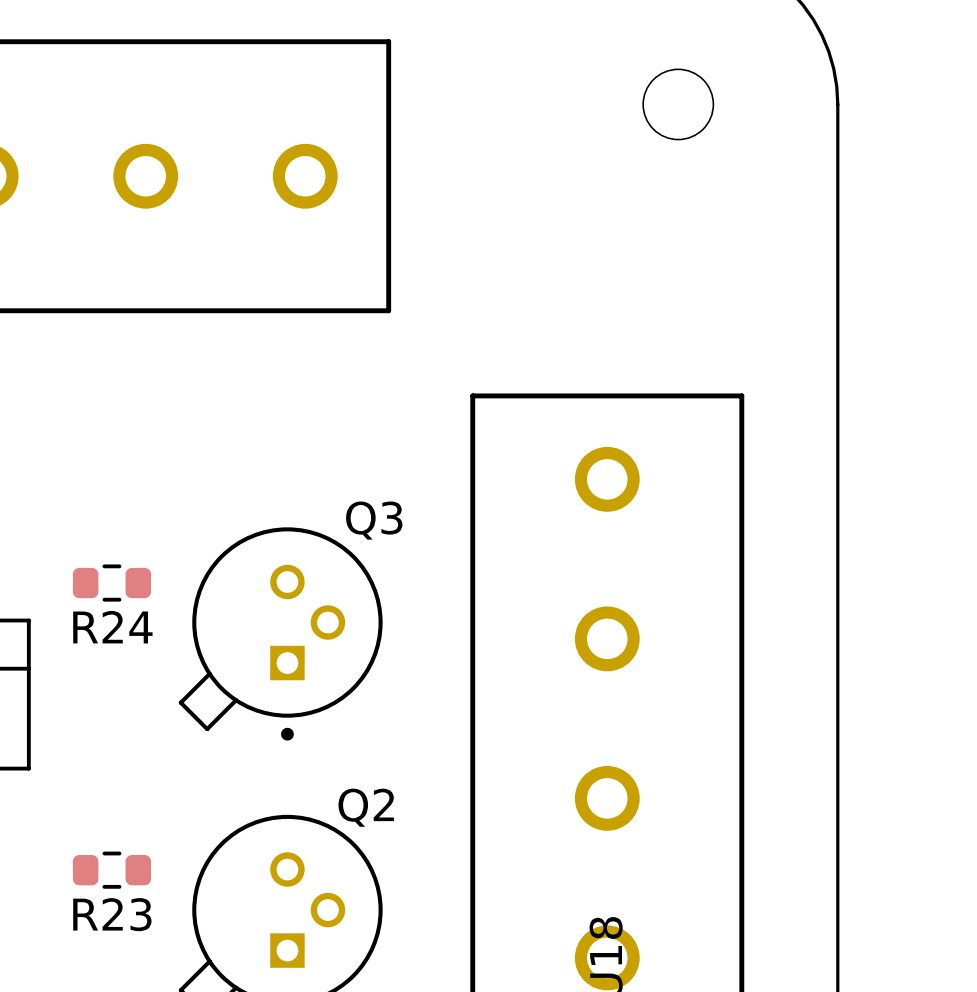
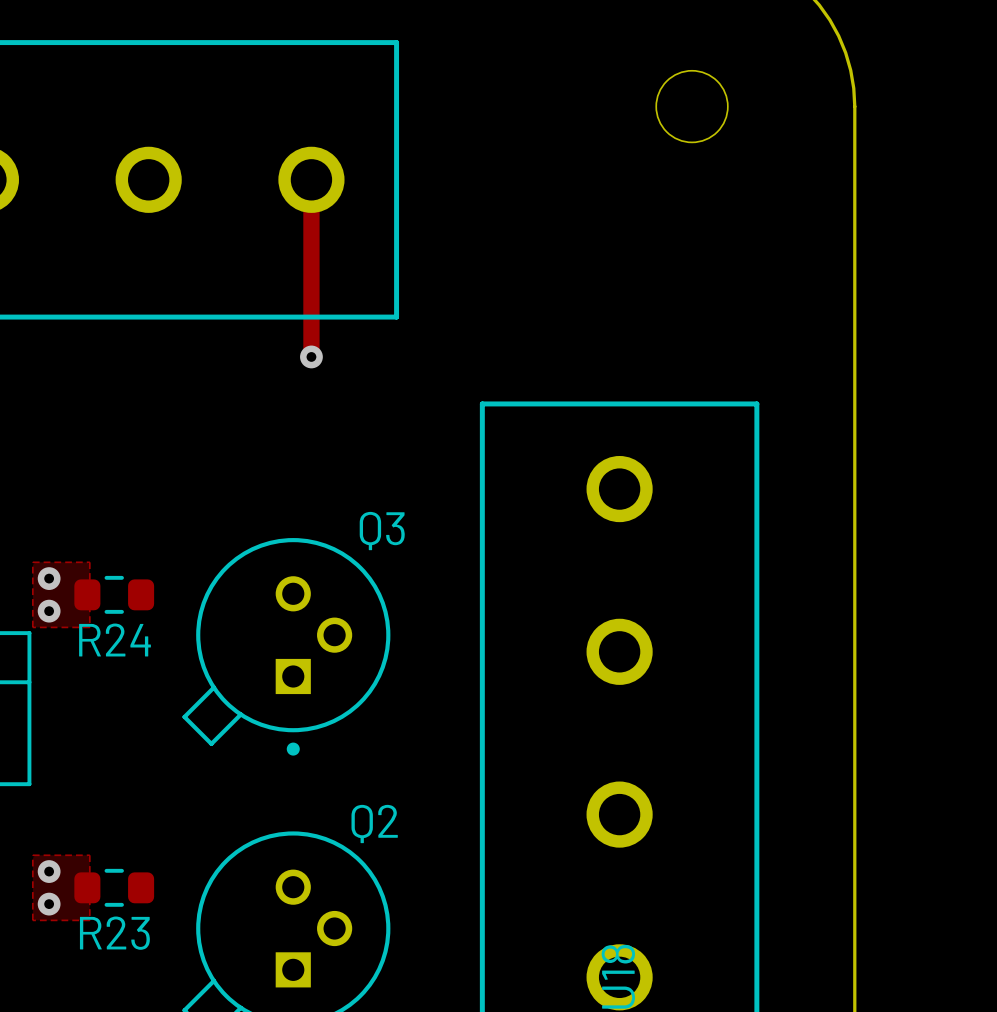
top track: none -> (311, 179) (311, 356)
via: none -> (311, 356)
top zone outline: none -> (32, 562) (32, 627) (89, 627) (89, 562) (32, 562)
via: none -> (49, 578)
via: none -> (49, 611)
top zone outline: none -> (32, 855) (32, 920) (89, 920) (89, 855) (32, 855)
via: none -> (49, 871)
via: none -> (49, 904)

